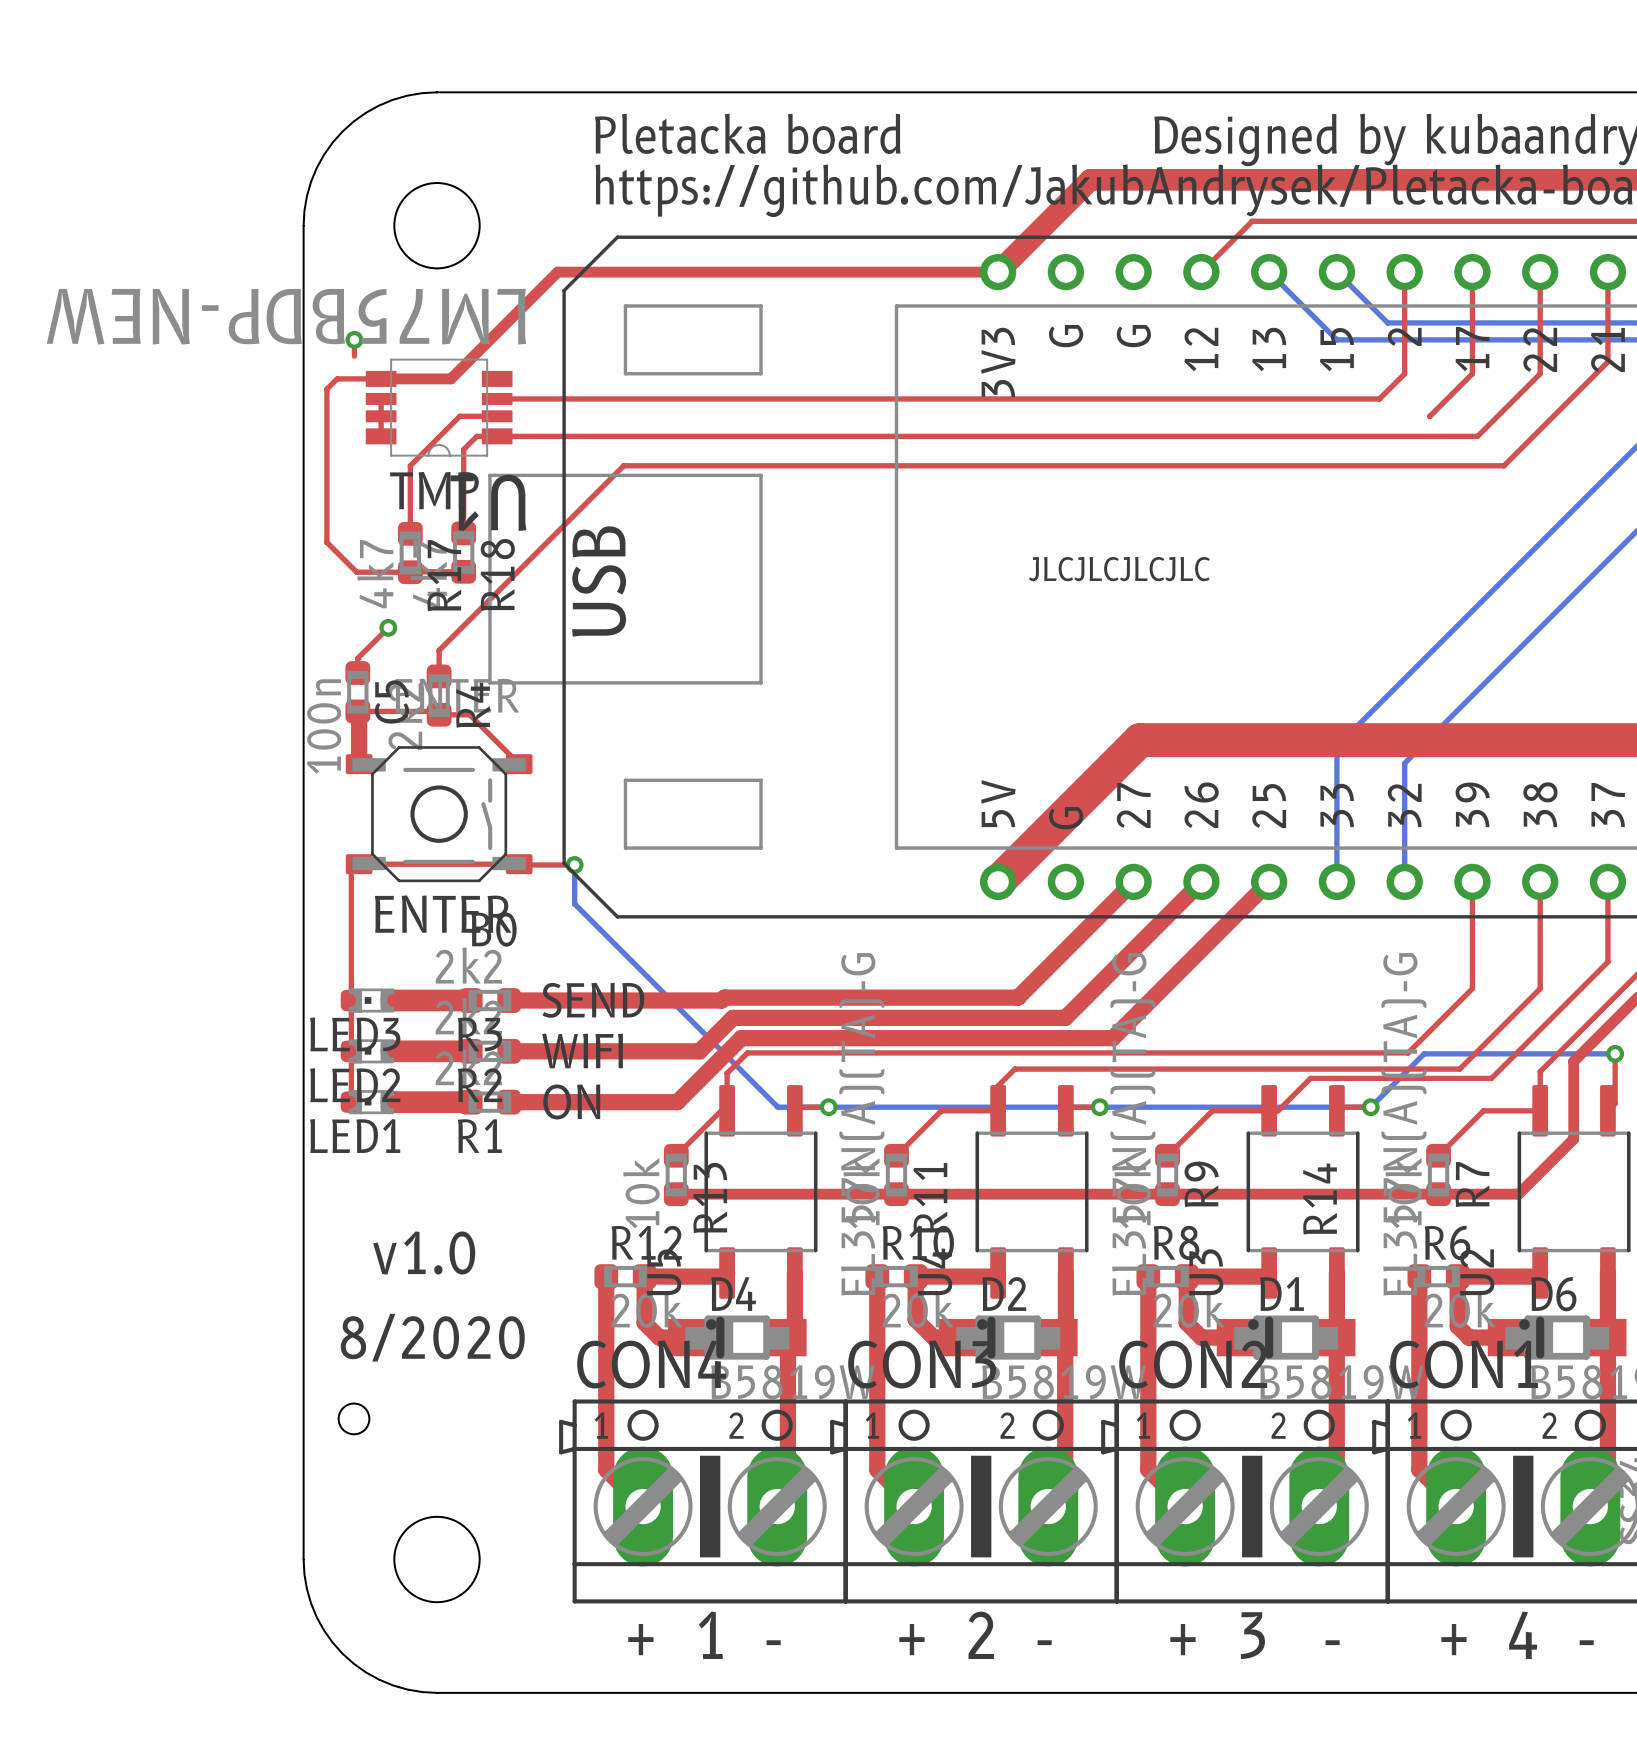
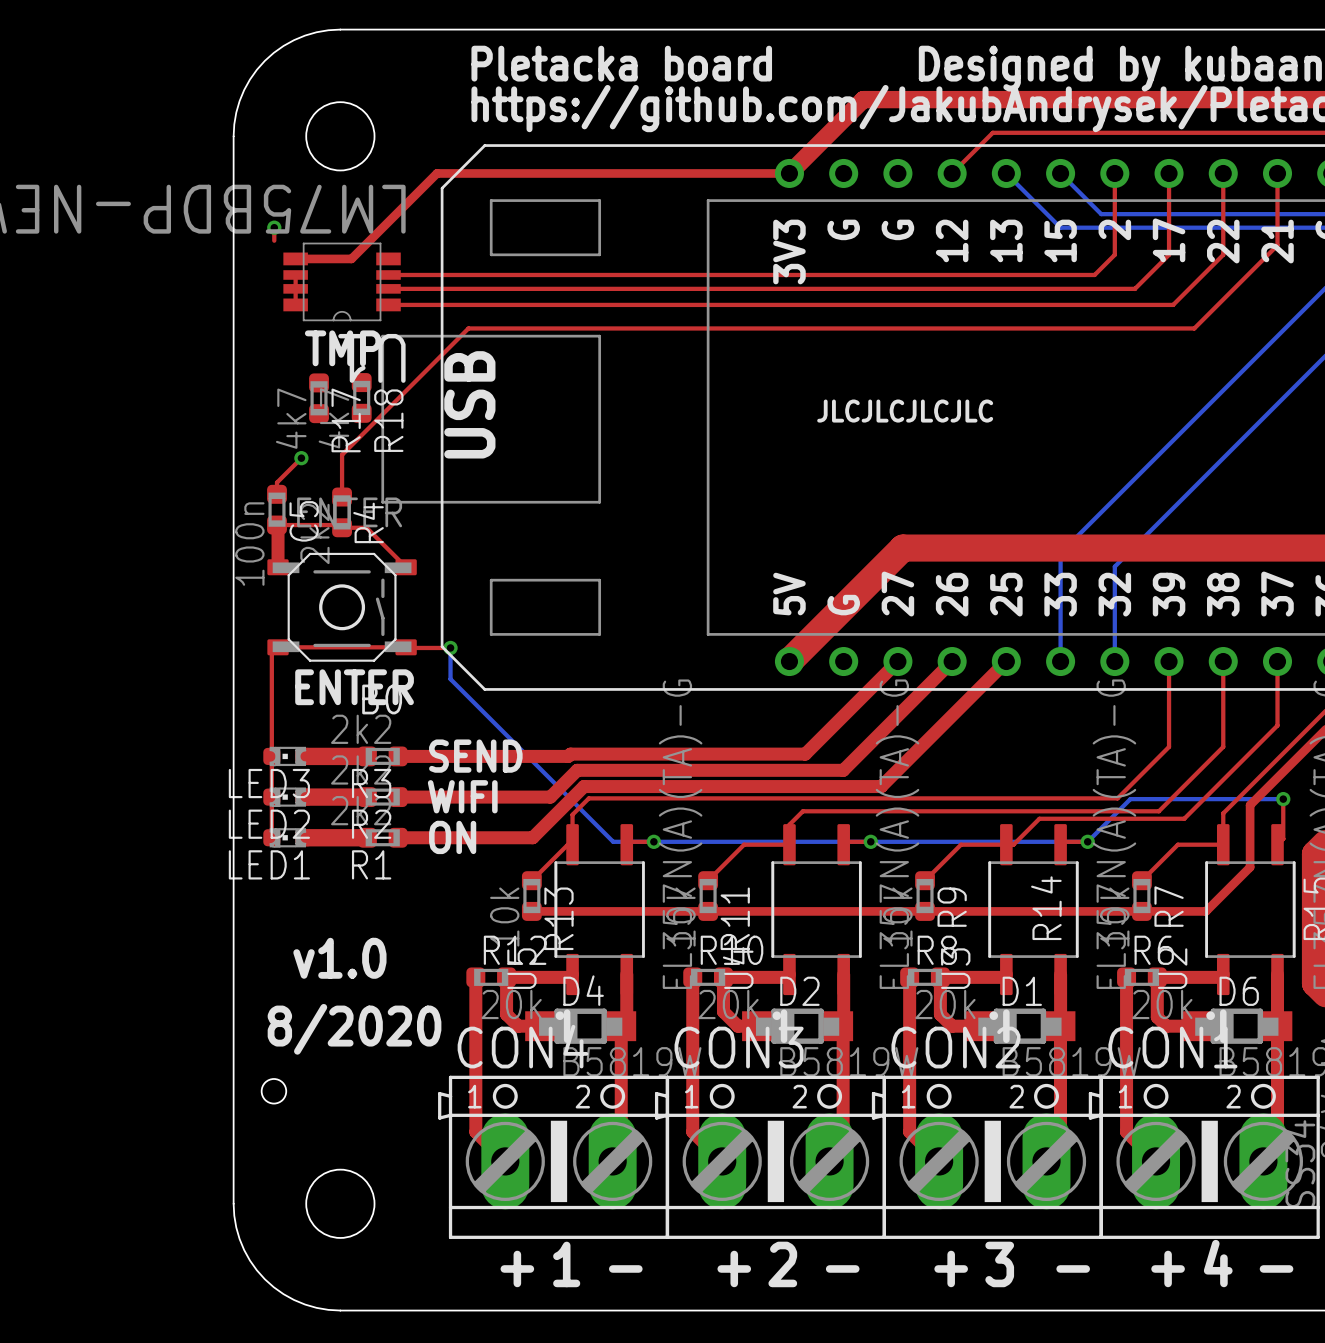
top track: (381, 378) (337, 378) (326, 389) (326, 542) (356, 572) (463, 571) -> none
top track: (497, 416) (459, 416) (410, 465) (410, 533) -> (388, 288) (1134, 288)
top track: (497, 436) (476, 436) (463, 449) (463, 533) -> none
top track: (623, 465) (439, 650) -> (489, 328) (468, 328) (342, 454) (342, 476)

